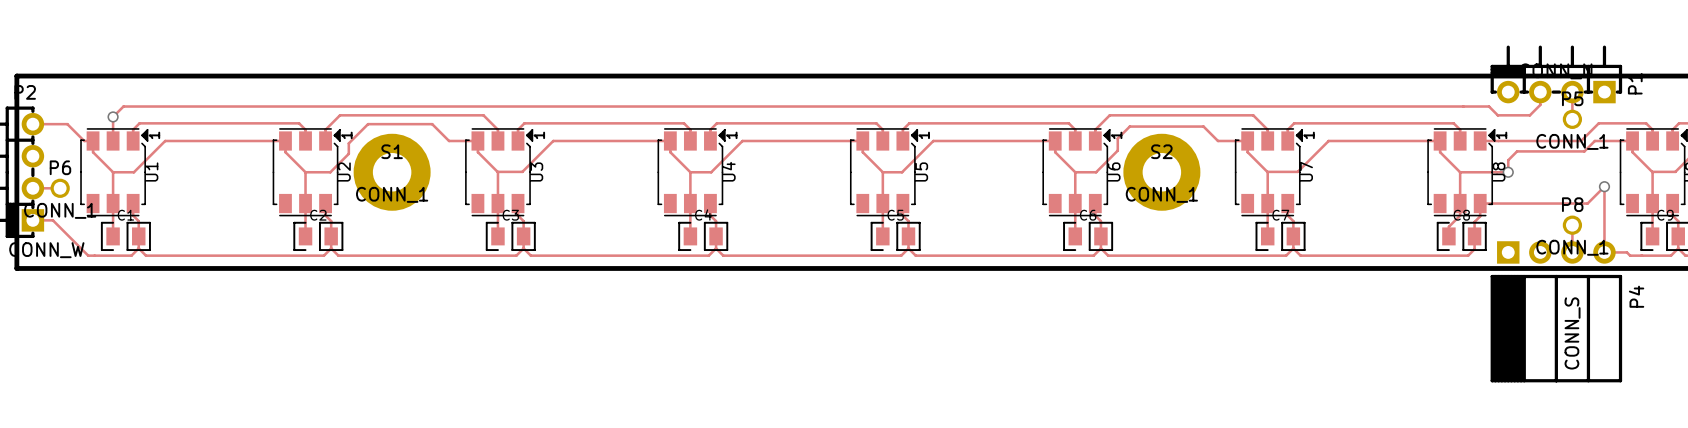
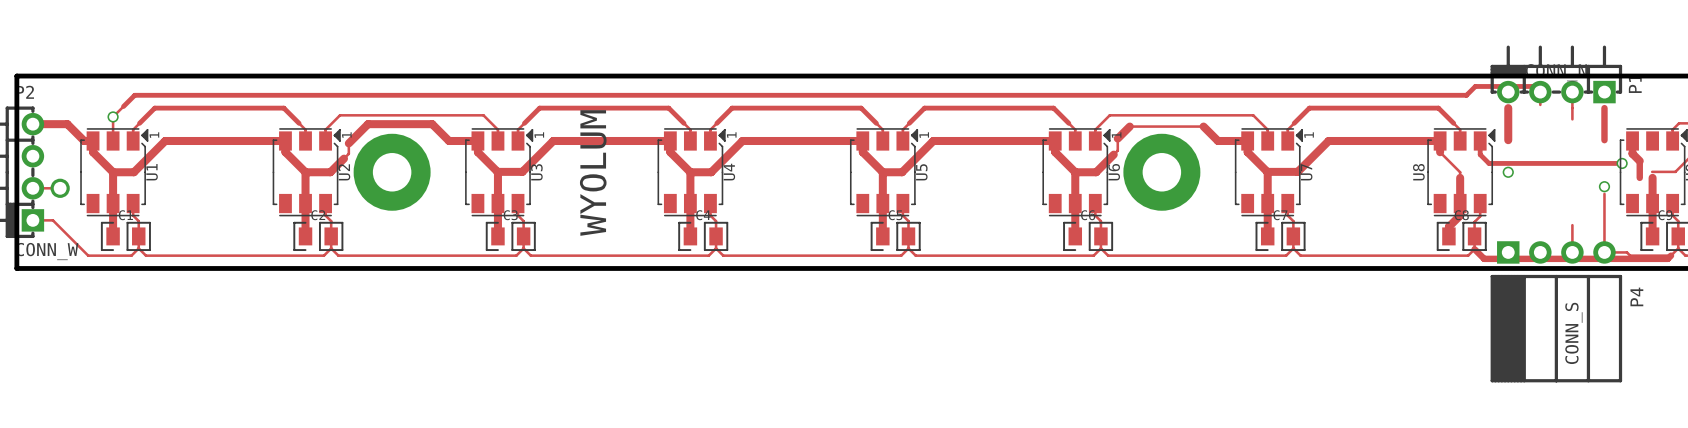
track: (1540, 104) (1529, 115) (1497, 115) (1489, 106) (123, 106) -> (1540, 93) (1533, 86) (1475, 86) (1466, 95) (134, 95) (123, 106)
track: none -> (1508, 108) (1508, 140)
track: none -> (1604, 108) (1604, 140)
P5: CONN_1 (1572, 119) -> none
track: (139, 123) (299, 123) -> (139, 123) (154, 108) (283, 108) (299, 123)
track: (524, 123) (683, 123) -> (524, 123) (539, 108) (668, 108) (683, 123)
track: (716, 123) (876, 123) -> (716, 123) (732, 108) (861, 108) (876, 123)
track: (909, 123) (1068, 123) -> (909, 123) (924, 108) (1053, 108) (1068, 123)
track: (1294, 123) (1453, 123) -> (1294, 123) (1309, 108) (1438, 108) (1453, 123)
track width: thin (32, 124) (67, 124) (84, 140) (93, 140) (93, 152) (113, 172) -> thick (32, 124) (67, 124) (84, 140) (93, 140) (93, 152) (113, 172)
track width: thin (1129, 126) (1117, 138) -> thick (1129, 126) (1117, 138)
track width: thin (1203, 126) (1218, 140) (1247, 140) (1247, 152) (1267, 172) (1267, 236) -> thick (1203, 126) (1218, 140) (1247, 140) (1247, 152) (1267, 172) (1267, 236)
U8 text: 1 (1501, 135) -> none
track: (1480, 140) (1581, 140) (1598, 123) (1646, 123) (1652, 129) (1652, 140) -> (1480, 140) (1480, 154) (1489, 163) (1622, 163)
track: (1632, 140) (1594, 140) (1584, 151) (1517, 151) (1508, 160) (1508, 172) (1460, 172) -> none
track width: thin (348, 143) (368, 124) (432, 124) (449, 140) (477, 140) (477, 152) (497, 172) (497, 236) -> thick (348, 143) (368, 124) (432, 124) (449, 140) (477, 140) (477, 152) (497, 172) (497, 236)
S1 name: S1 (392, 151) -> none
S2 name: S2 (1161, 151) -> none
track width: thin (1440, 152) (1440, 140) (1328, 140) (1297, 171) (1267, 171) -> thick (1440, 152) (1440, 140) (1328, 140) (1297, 171) (1267, 171)
track: (1632, 152) (1652, 172) (1652, 177) -> (1632, 152) (1639, 161) (1639, 177)
track width: thin (1113, 154) (1096, 172) (1075, 172) -> thick (1113, 154) (1096, 172) (1075, 172)
track width: thin (344, 158) (330, 172) (305, 172) -> thick (344, 158) (330, 172) (305, 172)
via: none -> (1622, 163)
P6 name: P6 (60, 167) -> none
track width: thin (497, 171) (522, 171) (553, 140) (670, 140) (670, 152) (690, 172) -> thick (497, 171) (522, 171) (553, 140) (670, 140) (670, 152) (690, 172)
track width: thin (113, 172) (133, 172) (165, 140) (285, 140) (285, 152) (305, 172) -> thick (113, 172) (133, 172) (165, 140) (285, 140) (285, 152) (305, 172)
track width: thin (113, 172) (113, 236) -> thick (113, 172) (113, 236)
track width: thin (305, 172) (305, 236) -> thick (305, 172) (305, 236)
track width: thin (690, 172) (711, 172) (742, 140) (862, 140) (862, 152) (882, 172) -> thick (690, 172) (711, 172) (742, 140) (862, 140) (862, 152) (882, 172)
track width: thin (690, 172) (690, 236) -> thick (690, 172) (690, 236)
track width: thin (882, 172) (882, 236) -> thick (882, 172) (882, 236)
track width: thin (882, 172) (902, 172) (933, 140) (1055, 140) (1055, 152) (1075, 172) -> thick (882, 172) (902, 172) (933, 140) (1055, 140) (1055, 152) (1075, 172)
track width: thin (1075, 172) (1075, 236) -> thick (1075, 172) (1075, 236)
U8 name position: U8 (1499, 172) -> U8 (1418, 172)
text: none -> WYOLUM (593, 173)
track width: thin (1460, 177) (1460, 215) (1448, 226) (1448, 236) -> thick (1460, 177) (1460, 215) (1448, 226) (1448, 236)
track width: thin (1652, 177) (1652, 236) -> thick (1652, 177) (1652, 236)
track: (1604, 193) (1604, 186) (1587, 203) (1480, 203) -> none
S1 value: CONN_1 (392, 194) -> none
S2 value: CONN_1 (1161, 194) -> none
P6 value: CONN_1 (60, 210) -> none
P8: CONN_1 (1572, 225) -> none
track: none -> (1474, 249) (1484, 258) (1667, 258) (1671, 255)

